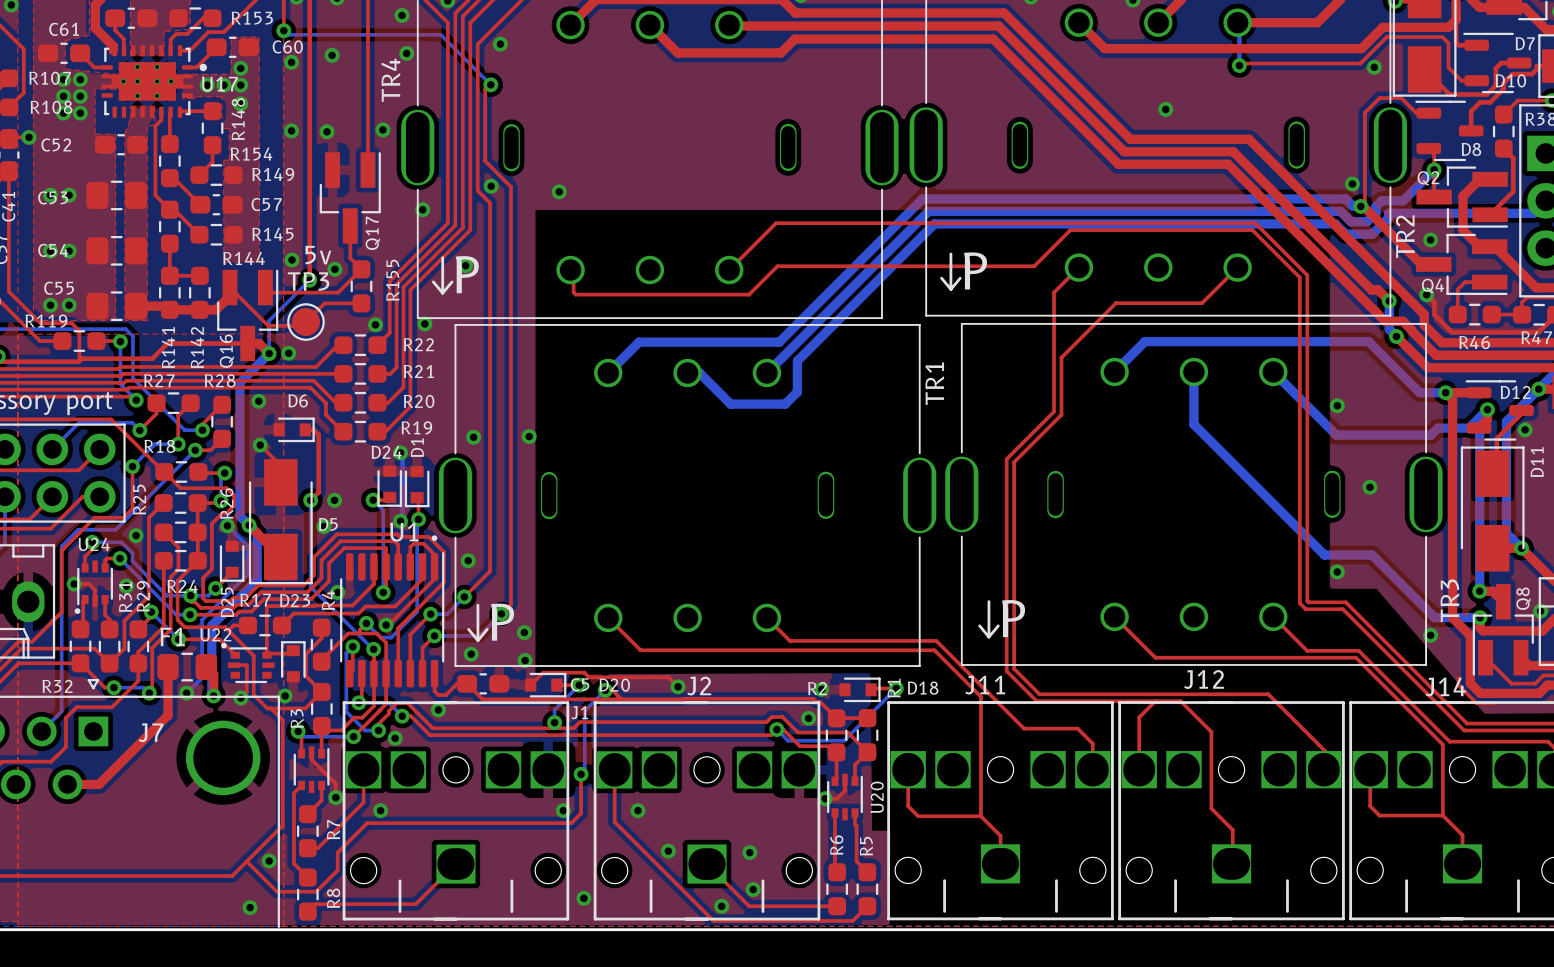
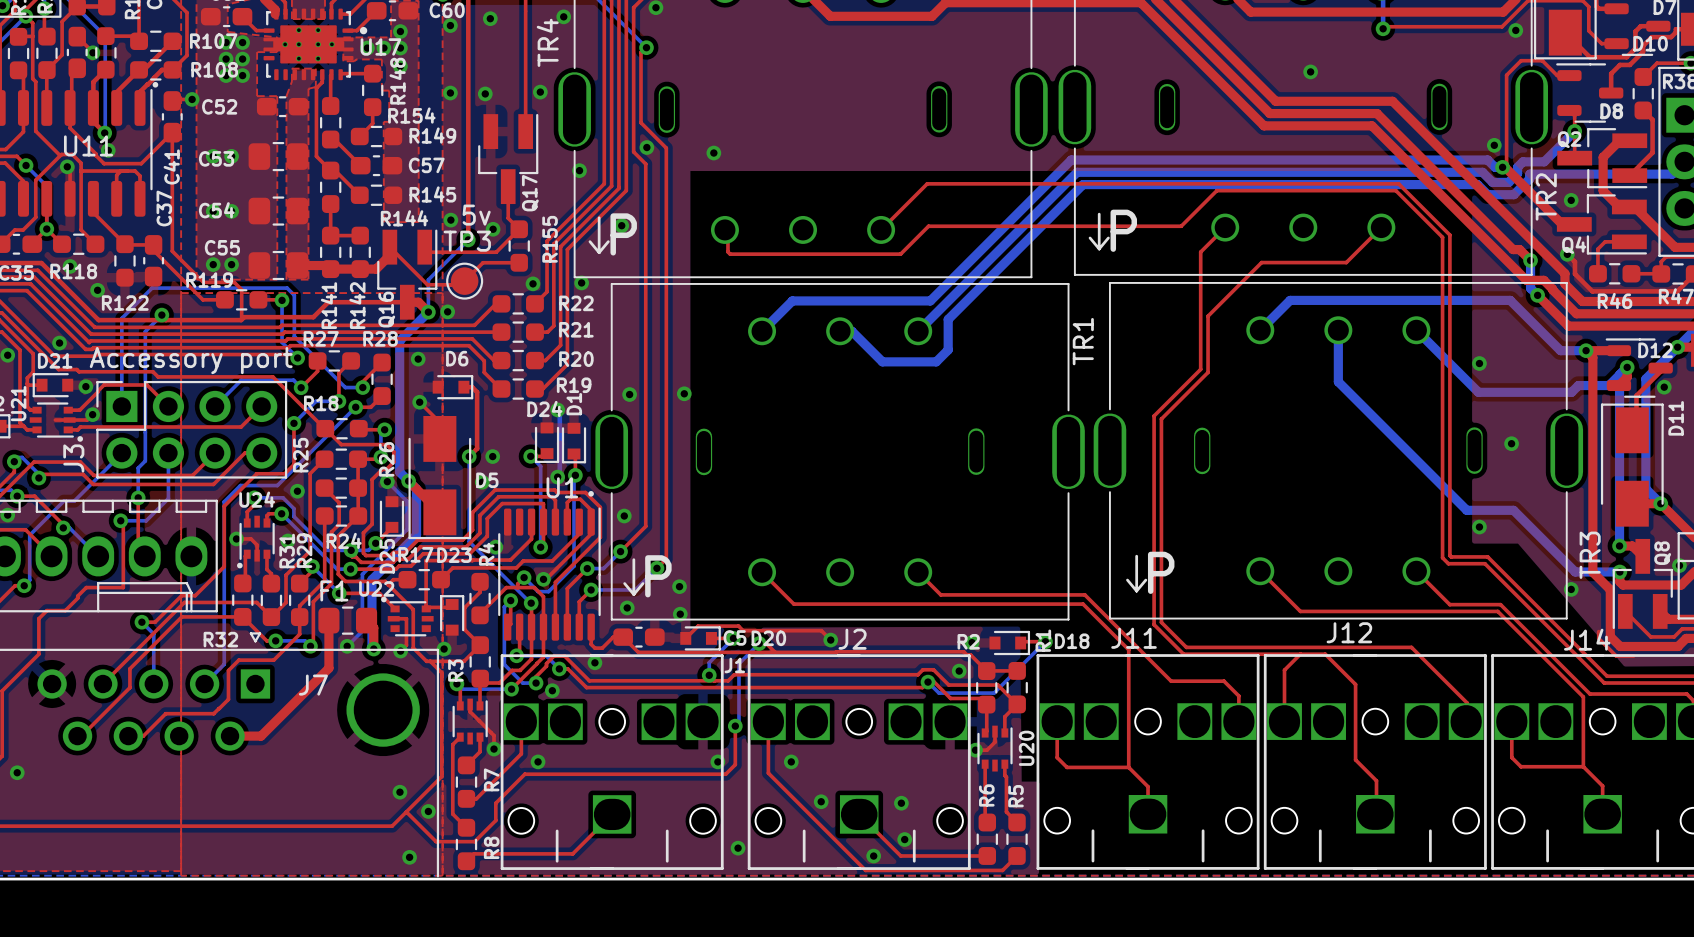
via: none -> (399, 792)

